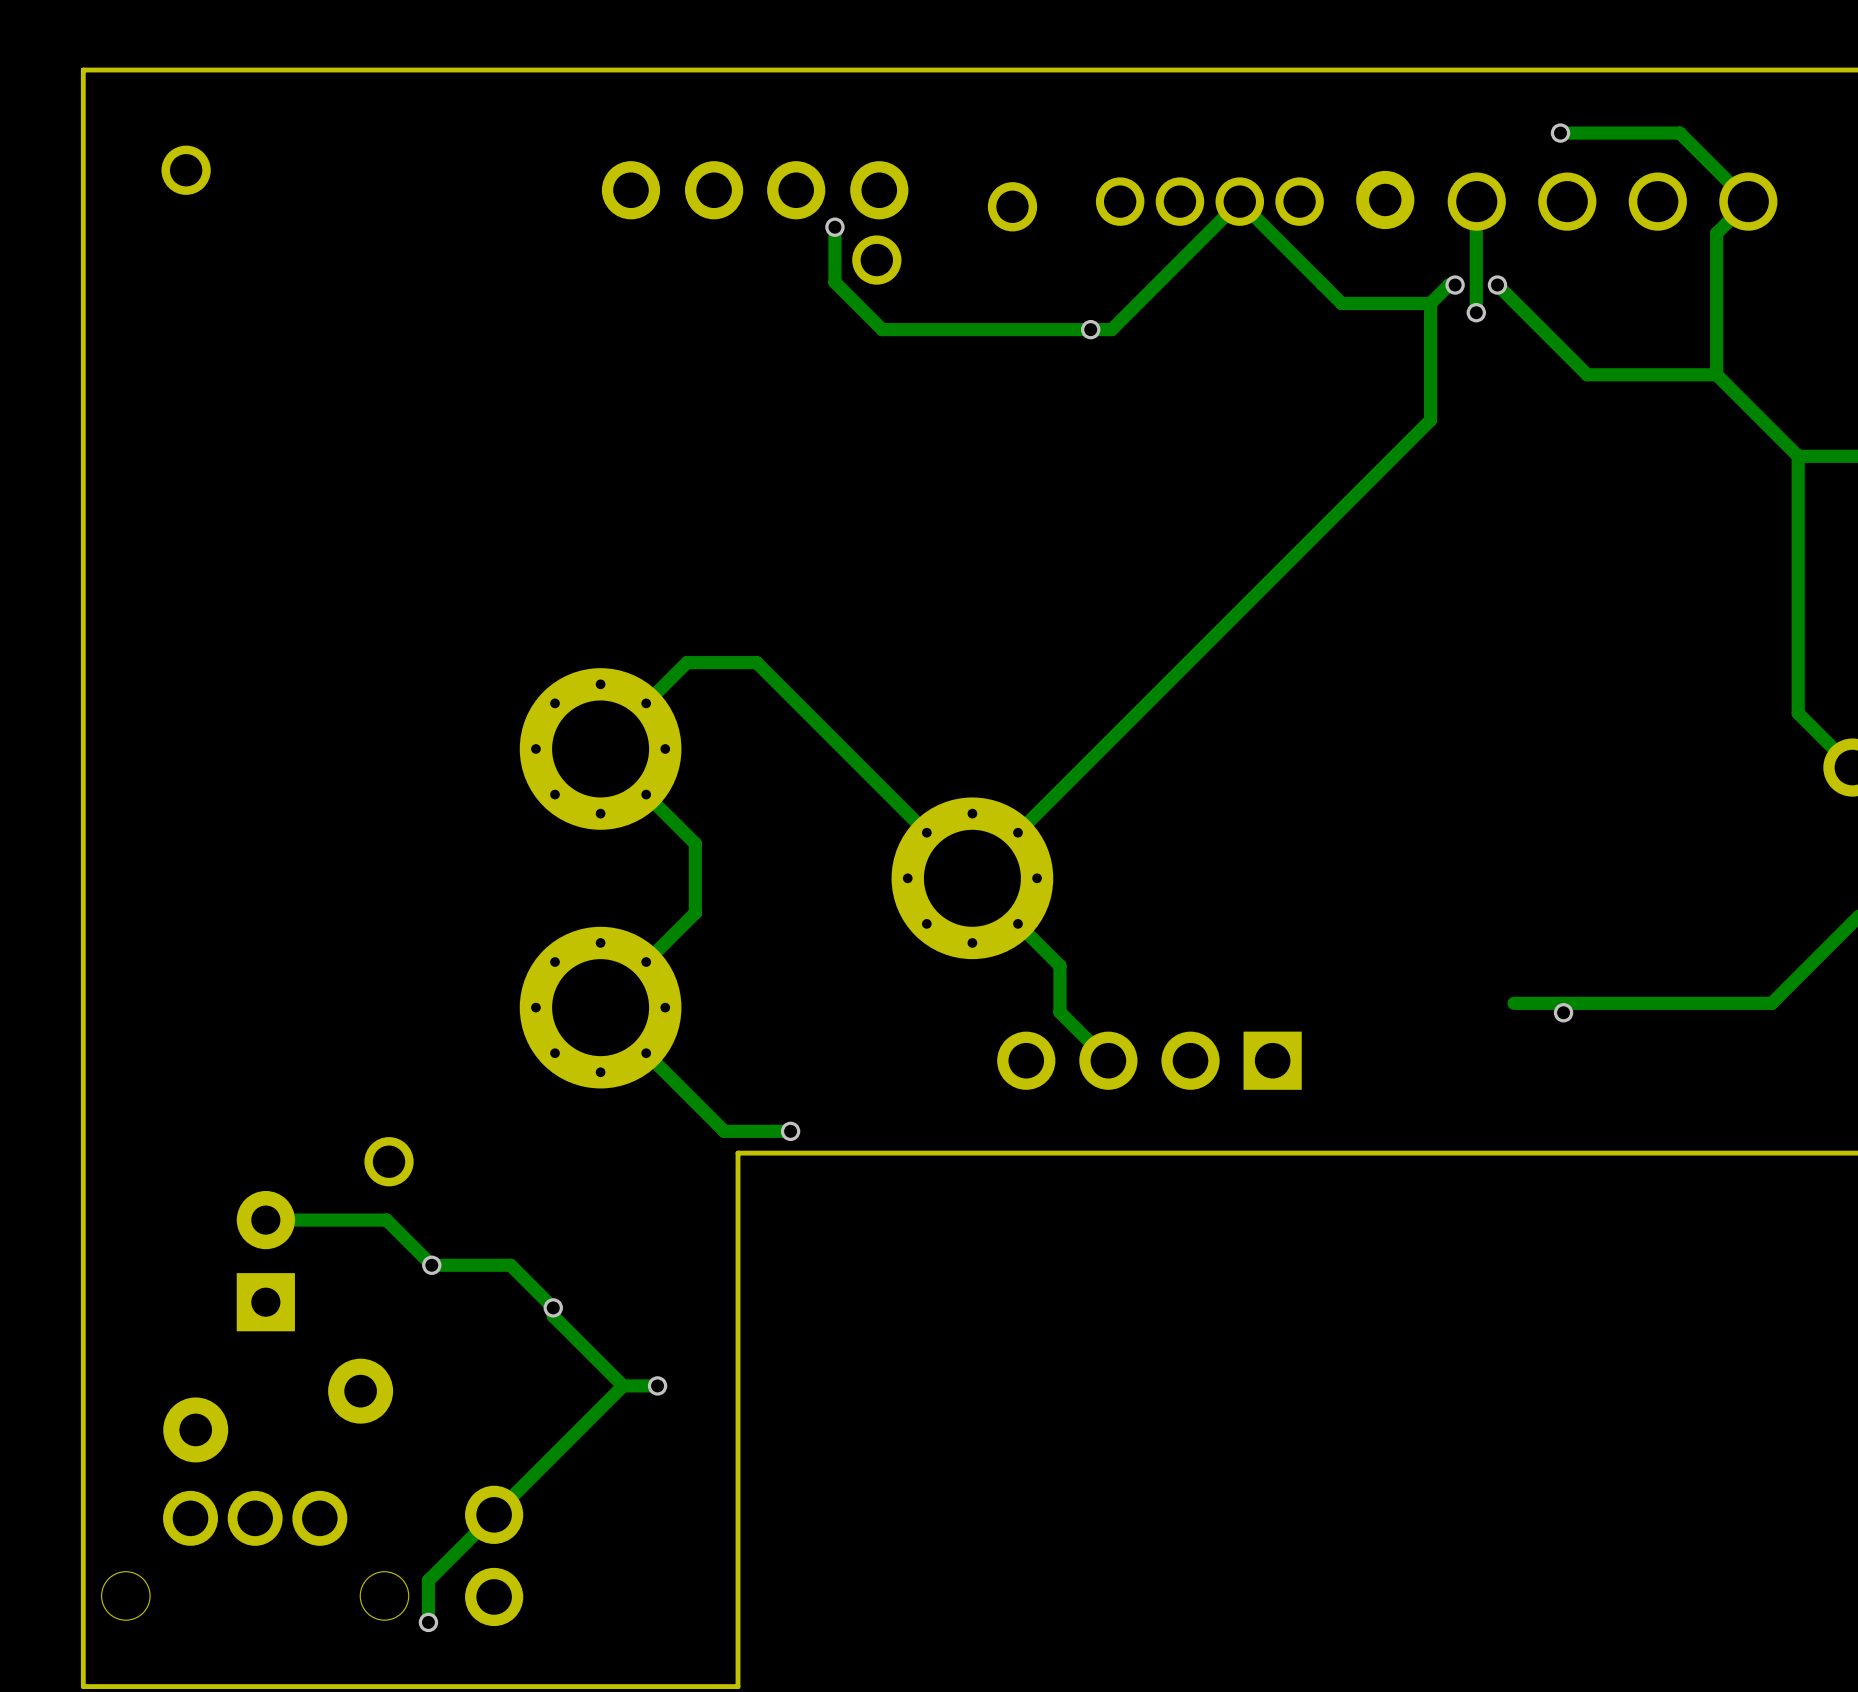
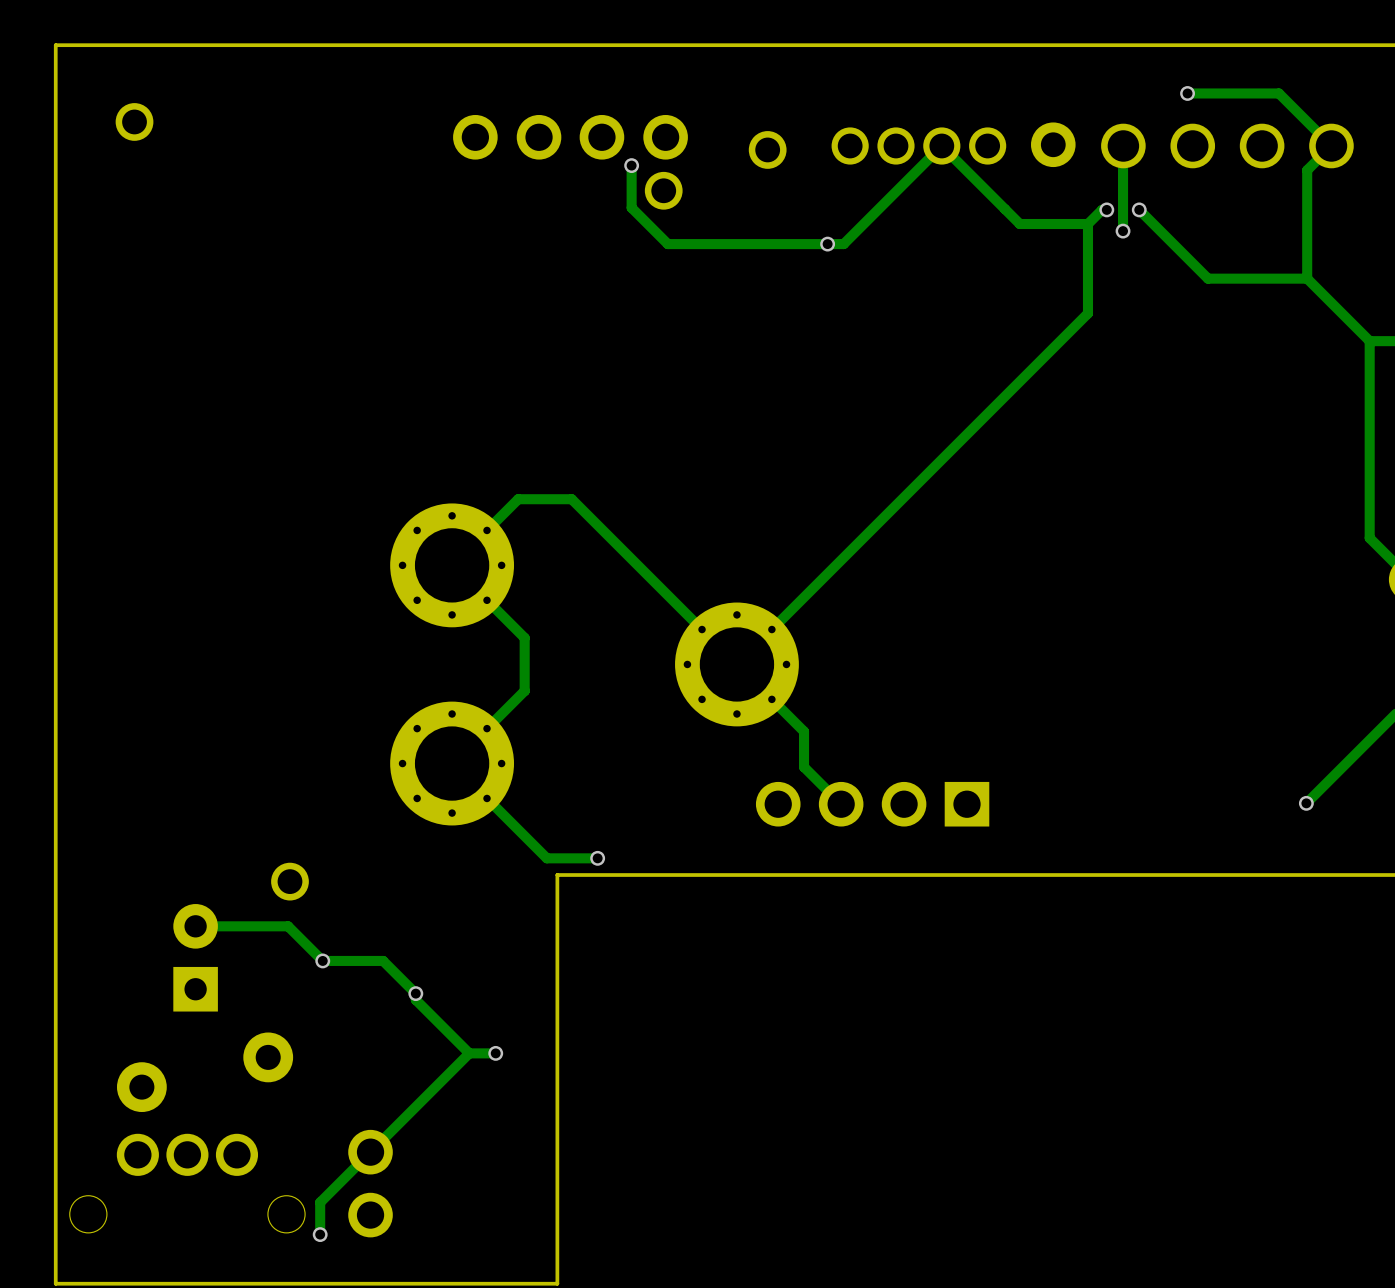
track: (1771, 1003) (1514, 1003) -> (1349, 760) (1306, 803)
via position: (1563, 1012) -> (1306, 803)

